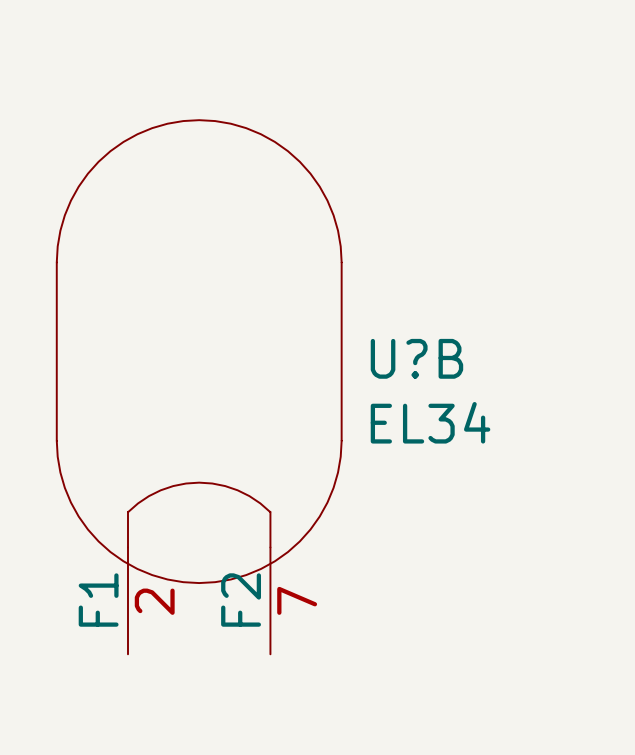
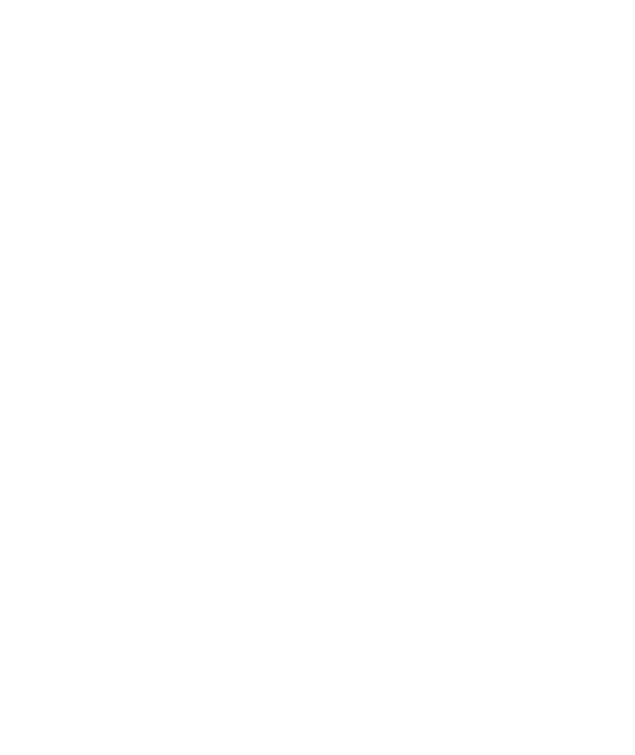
U?B: EL34 (199, 387) -> none

